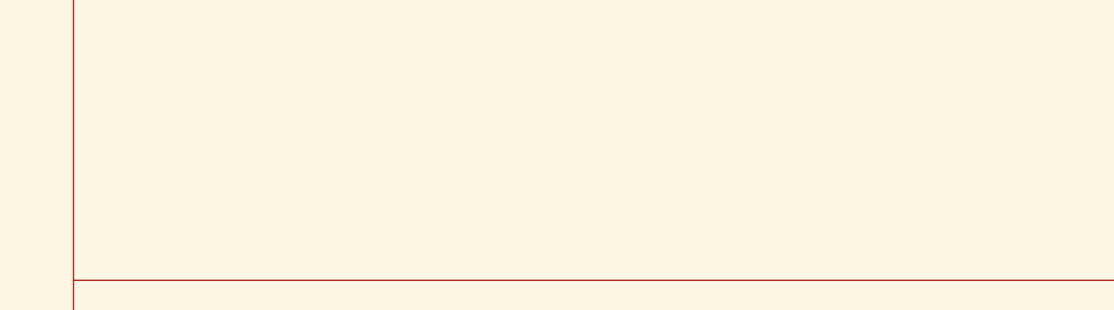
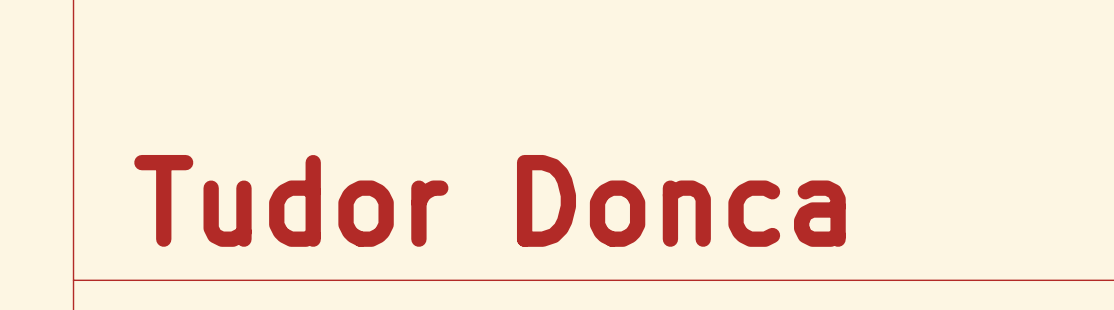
title block: none -> Tudor Donca (490, 200)

